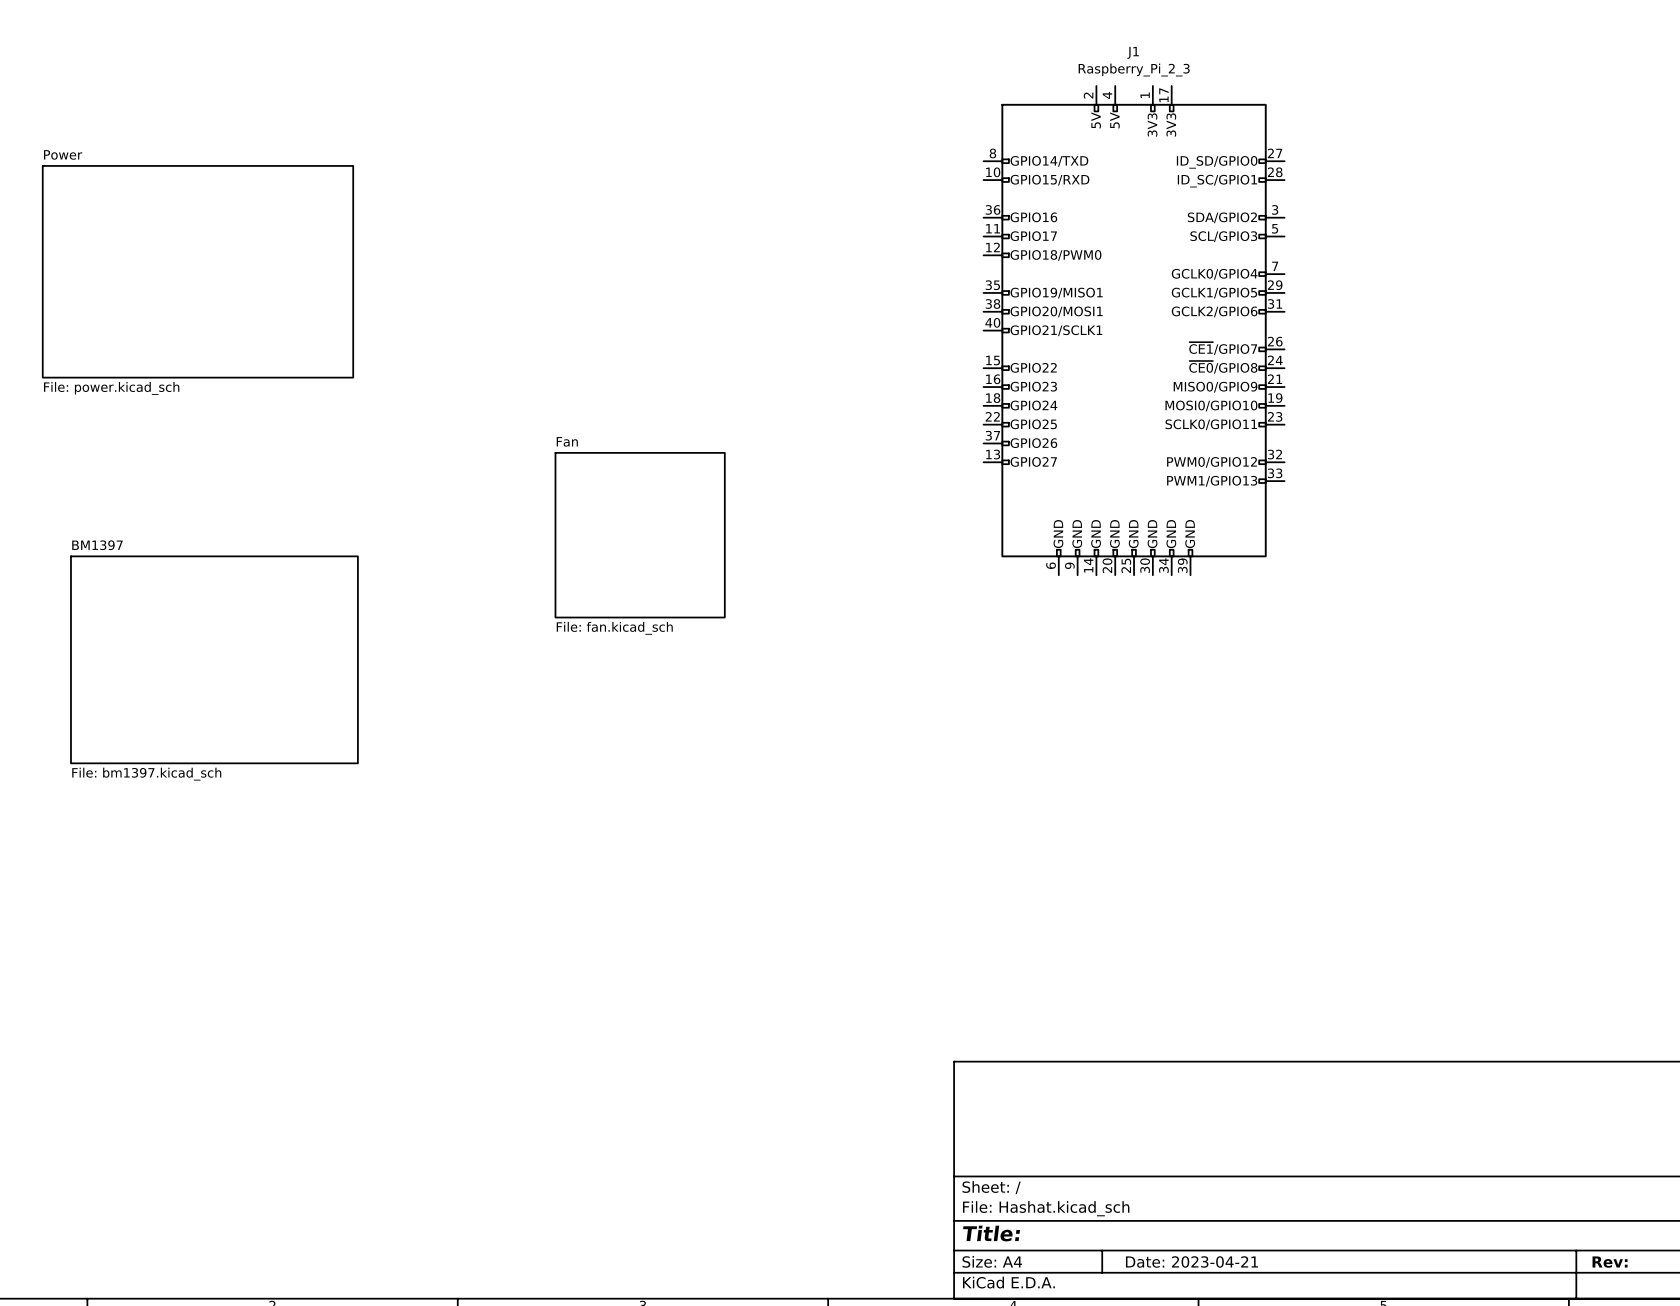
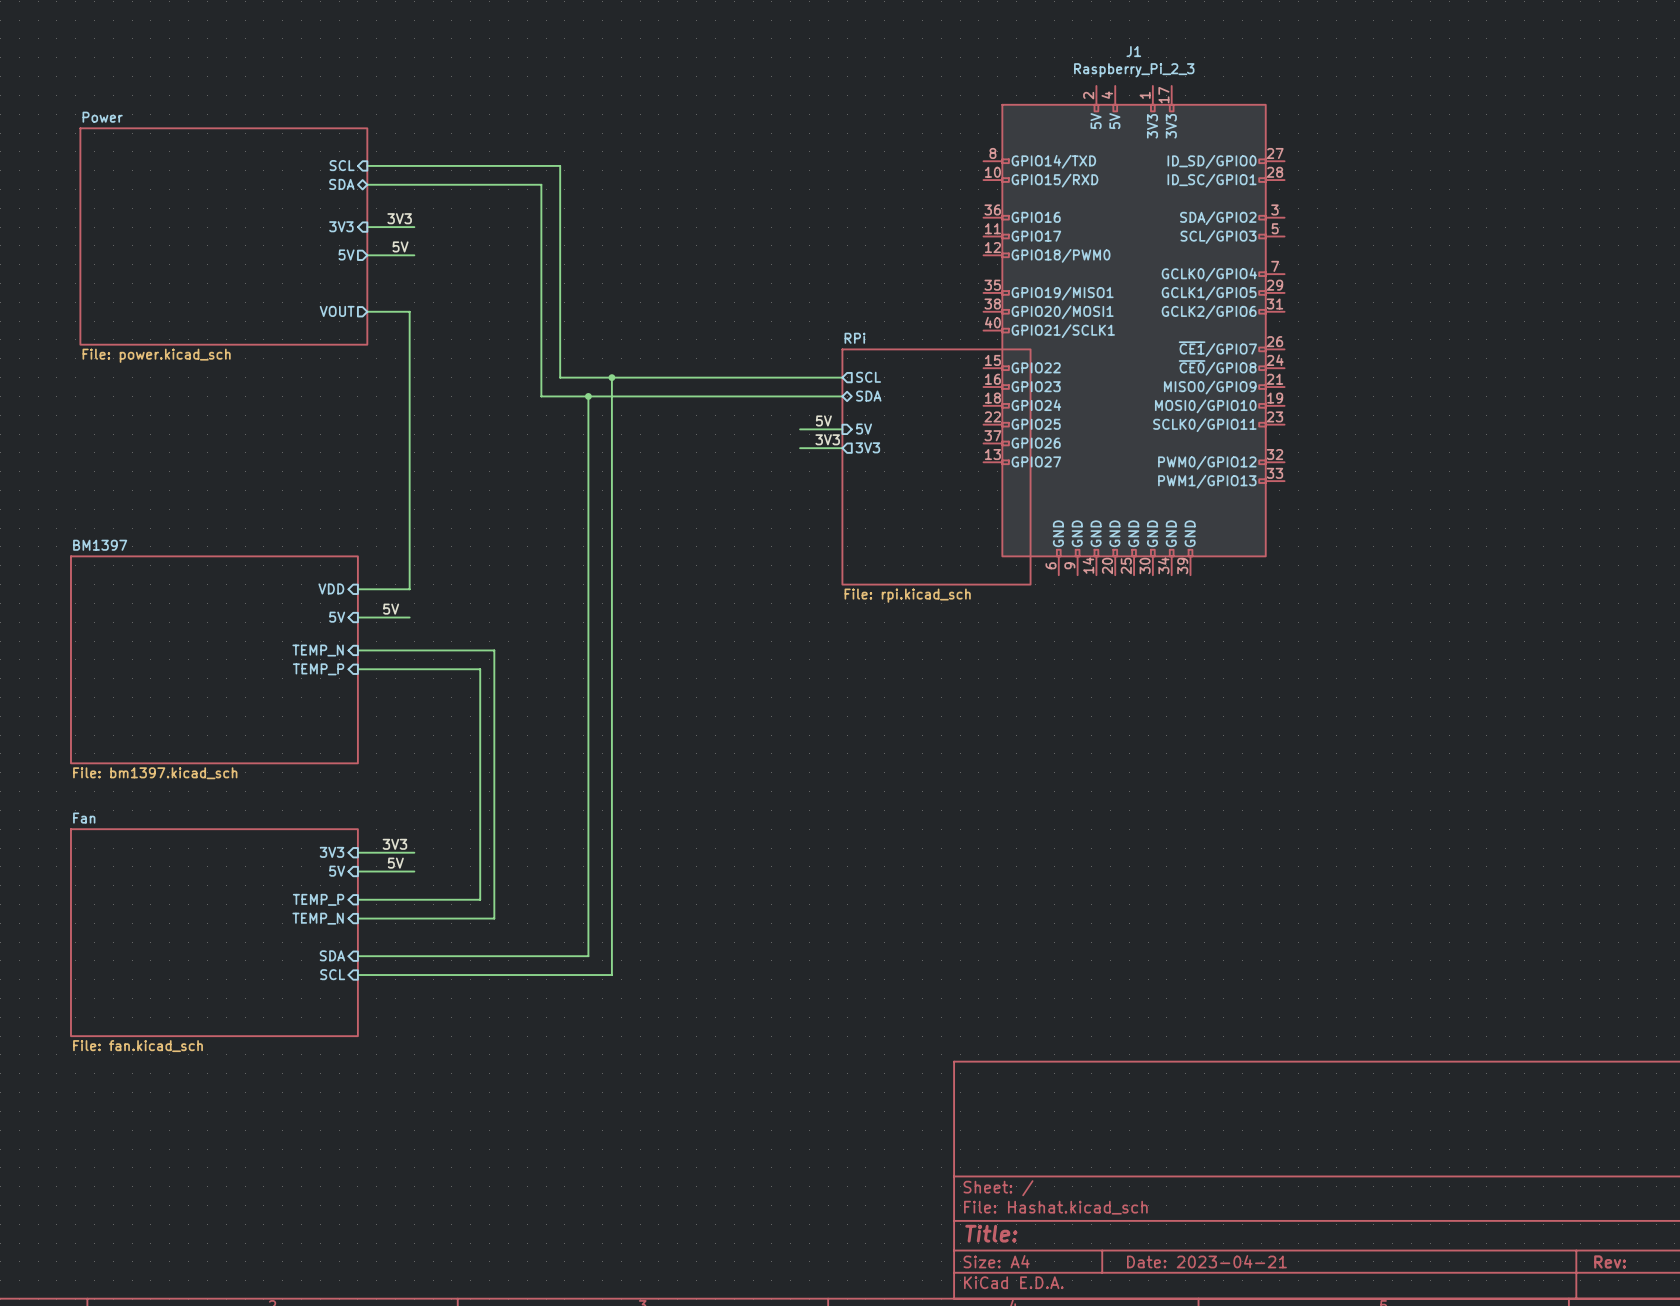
sheet pin: none -> SCL (342, 165)
wire: none -> (367, 165) (560, 165) (560, 377) (842, 377)
sheet pin: none -> SDA (341, 184)
wire: none -> (367, 184) (541, 184) (541, 396) (842, 396)
label: none -> 3V3 (399, 218)
sheet pin: none -> 3V3 (341, 226)
wire: none -> (367, 227) (414, 227)
sheet Power: none -> File: power.kicad_sch (223, 236)
label: none -> 5V (400, 246)
sheet pin: none -> 5V (346, 254)
wire: none -> (367, 255) (414, 255)
sheet Power: File: power.kicad_sch (197, 271) -> none
sheet pin: none -> VOUT (337, 311)
wire: none -> (367, 311) (409, 311) (409, 589) (357, 589)
wire: none -> (611, 377) (611, 975) (357, 975)
junction: none -> (611, 377)
sheet pin: none -> SCL (868, 377)
wire: none -> (588, 396) (588, 956) (357, 956)
junction: none -> (588, 396)
sheet pin: none -> SDA (868, 396)
label: none -> 5V (823, 420)
wire: none -> (800, 429) (842, 429)
sheet pin: none -> 5V (864, 429)
label: none -> 3V3 (827, 439)
sheet pin: none -> 3V3 (867, 447)
wire: none -> (800, 448) (842, 448)
sheet RPi: none -> File: rpi.kicad_sch (936, 466)
sheet Fan: File: fan.kicad_sch (640, 535) -> none
sheet pin: none -> VDD (331, 588)
label: none -> 5V (391, 609)
sheet pin: none -> 5V (337, 617)
wire: none -> (357, 617) (409, 617)
wire: none -> (357, 650) (494, 650) (494, 918) (357, 918)
sheet pin: none -> TEMP_N (318, 650)
wire: none -> (357, 669) (480, 669) (480, 899) (357, 899)
sheet pin: none -> TEMP_P (318, 669)
label: none -> 3V3 (394, 844)
sheet pin: none -> 3V3 (332, 852)
wire: none -> (357, 852) (414, 852)
label: none -> 5V (395, 863)
sheet pin: none -> 5V (337, 871)
wire: none -> (357, 871) (414, 871)
sheet pin: none -> TEMP_P (318, 899)
sheet pin: none -> TEMP_N (318, 918)
sheet Fan: none -> File: fan.kicad_sch (214, 932)
sheet pin: none -> SDA (332, 955)
sheet pin: none -> SCL (332, 974)

